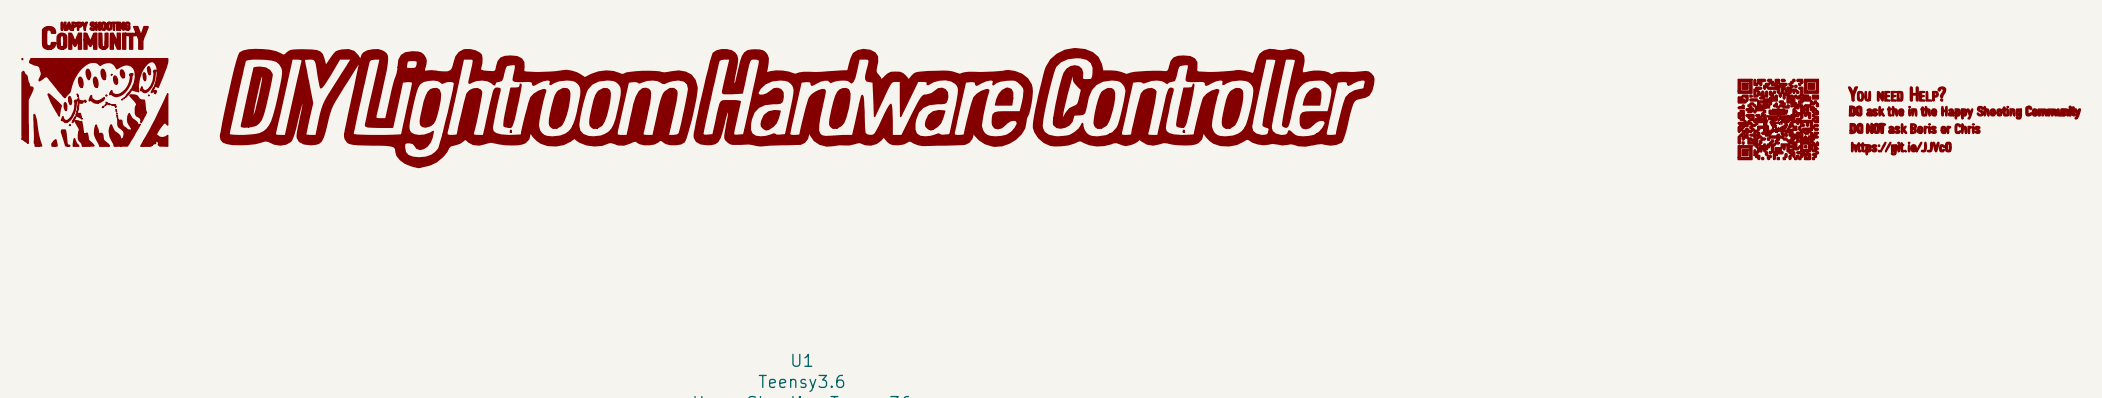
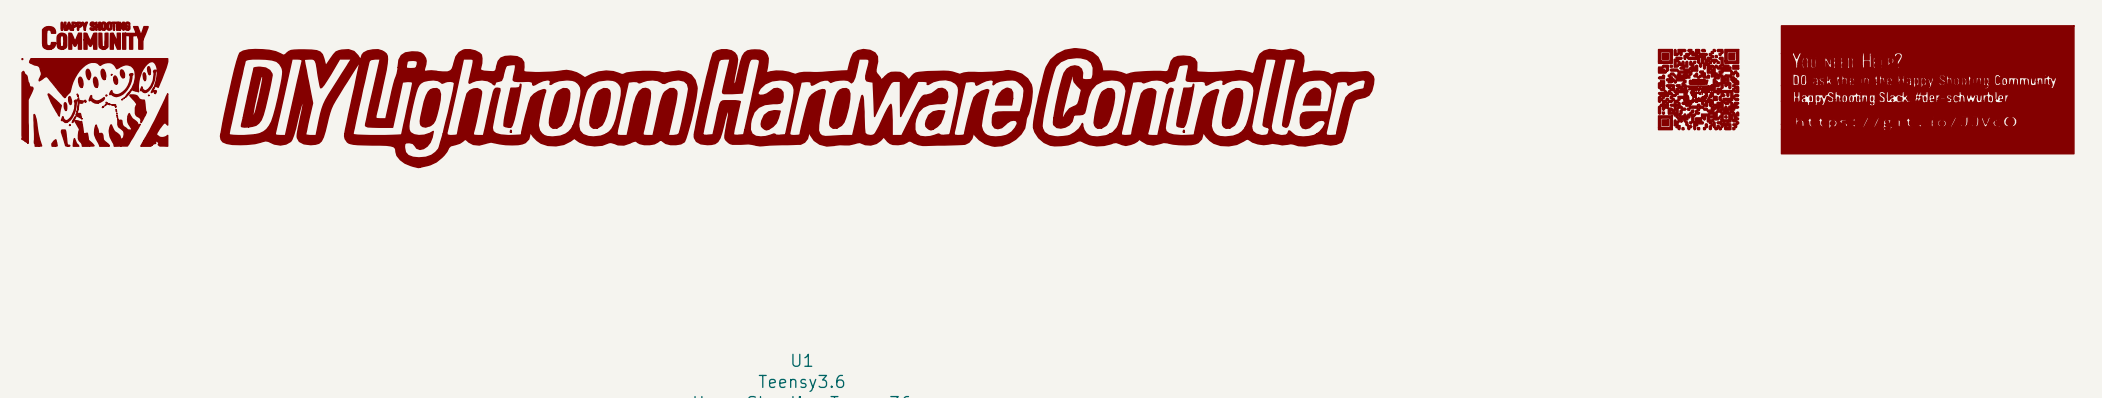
part: none -> (1927, 89)
part position: (1778, 119) -> (1698, 89)
part: (1964, 120) -> none

